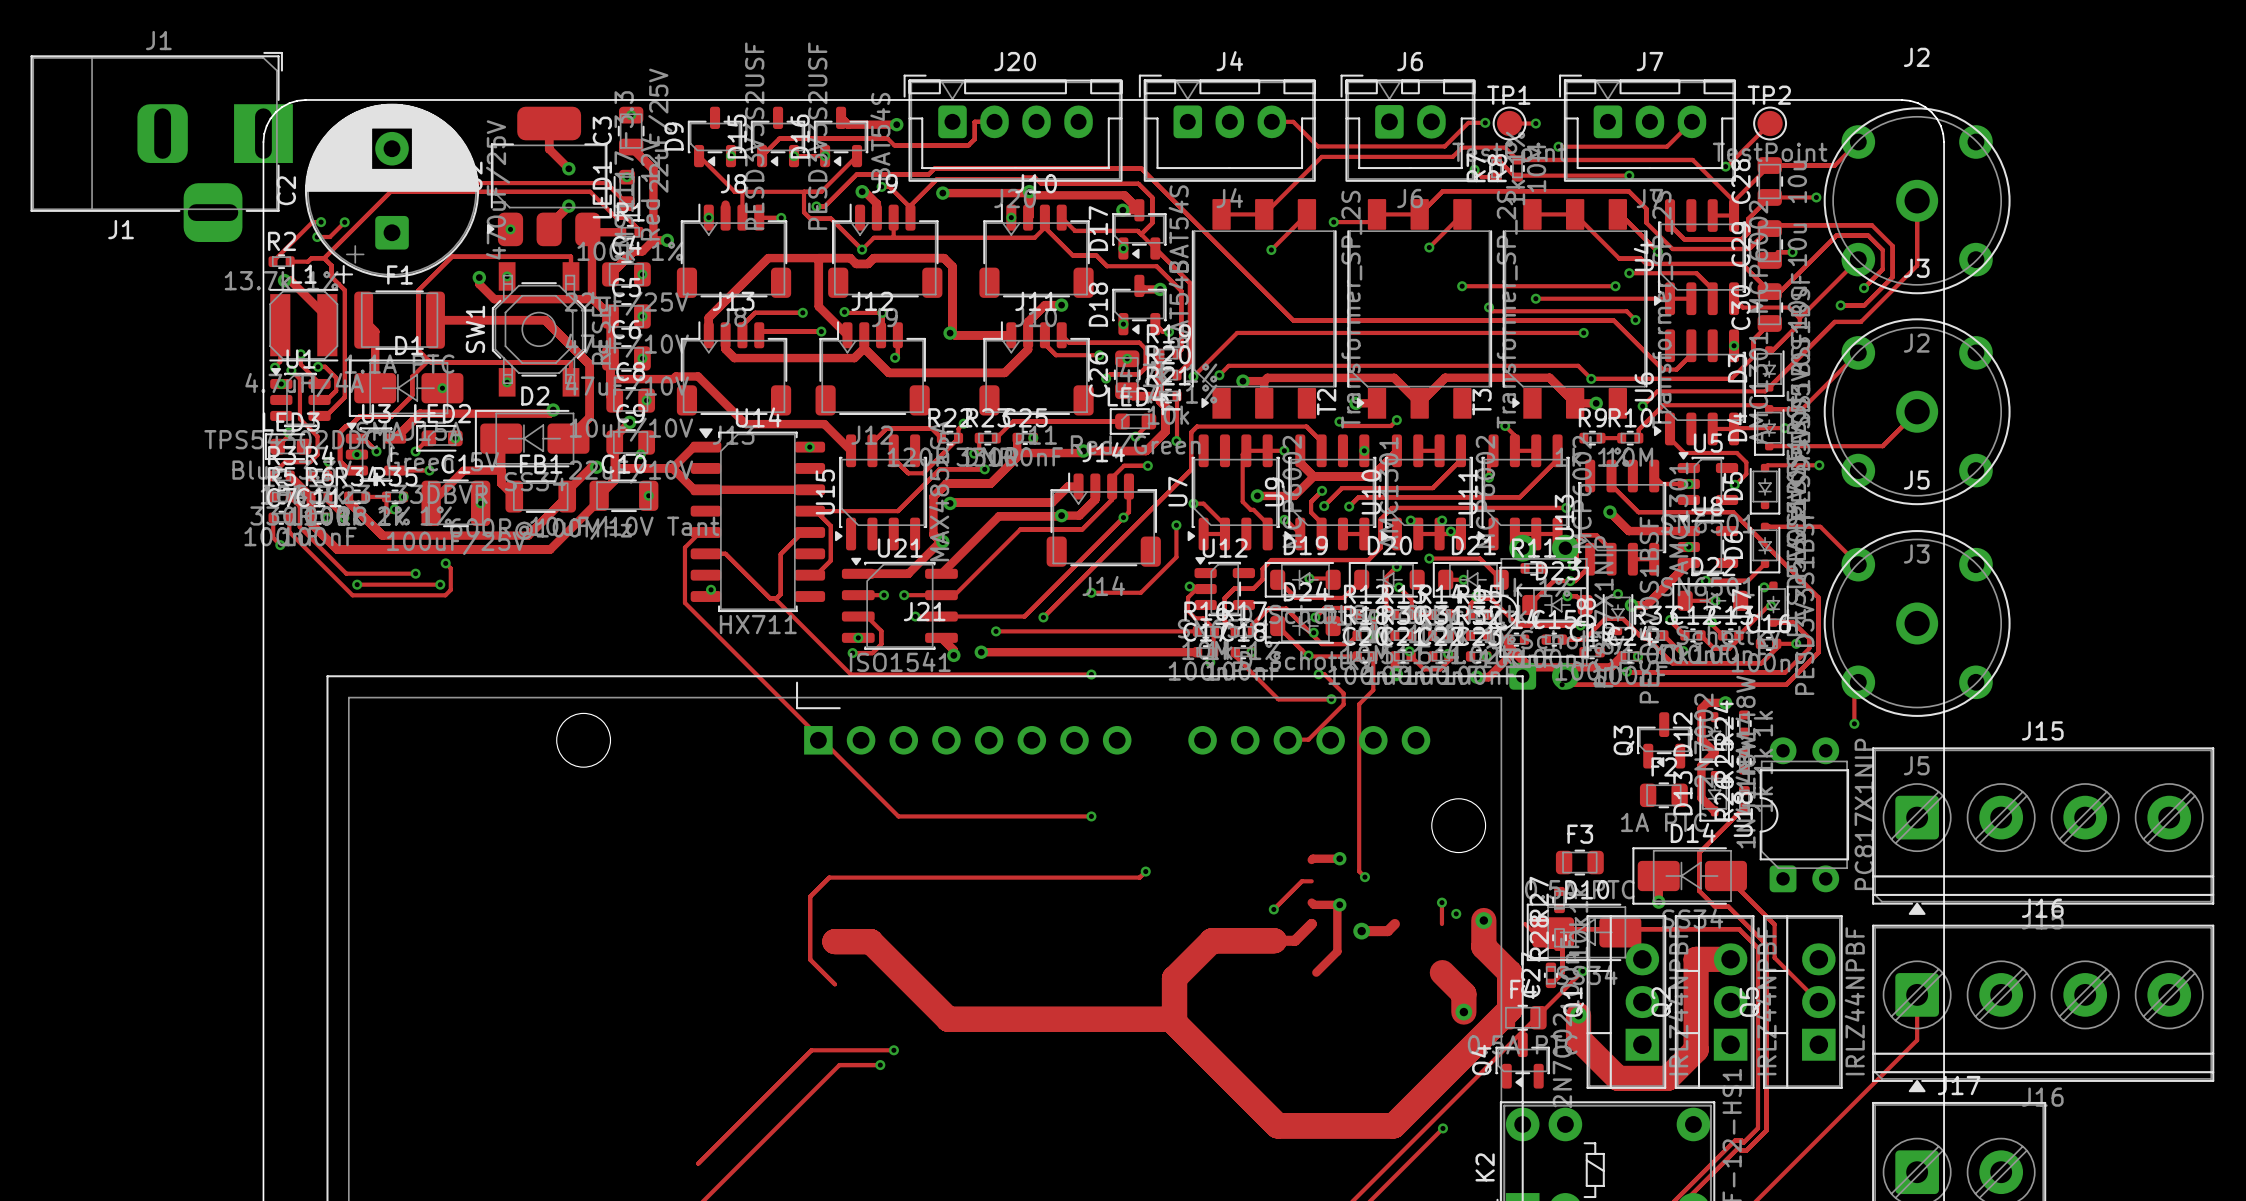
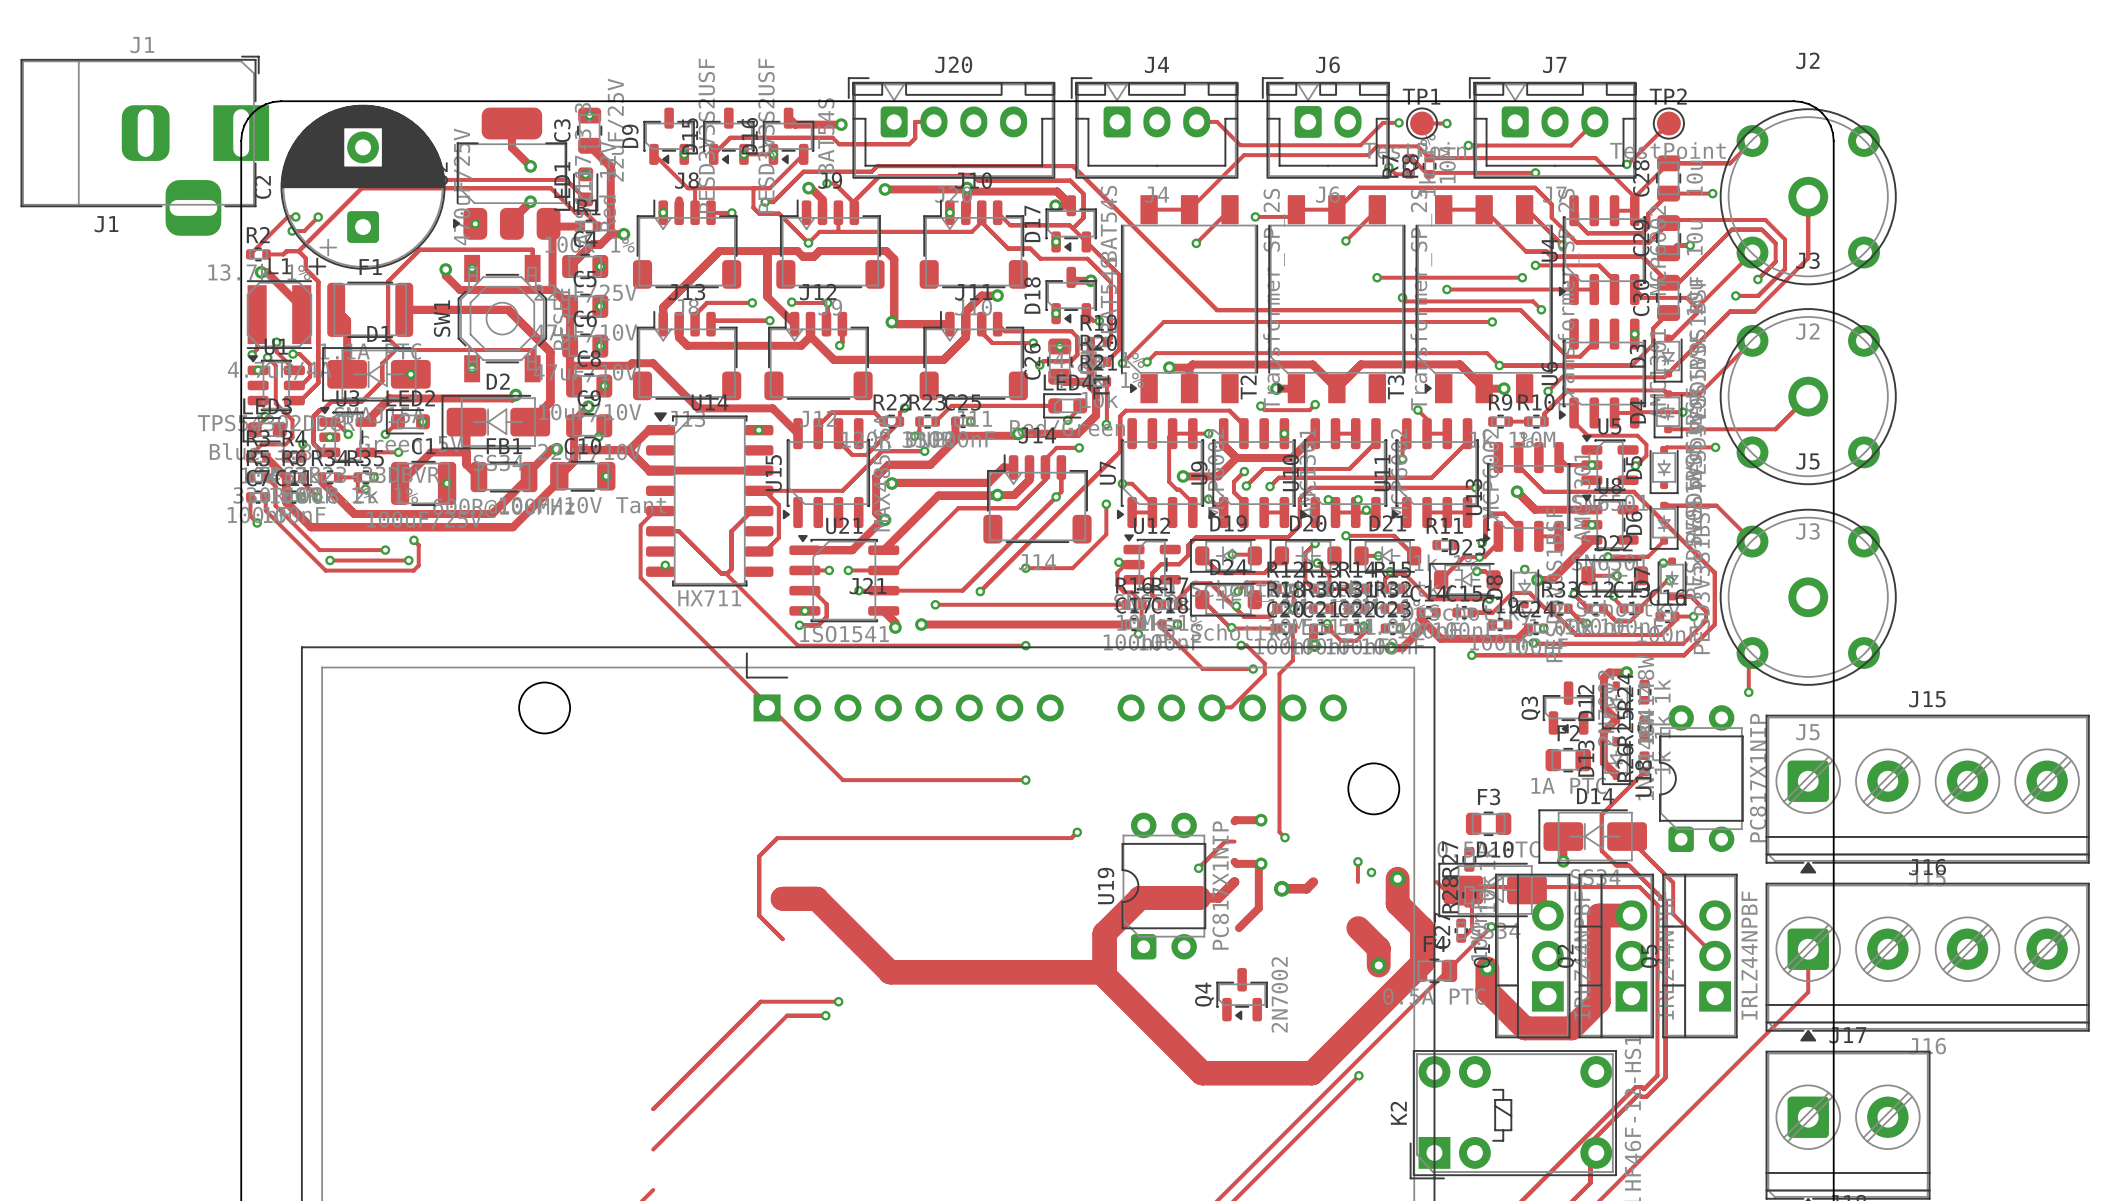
U19 position: (1544, 612) -> (1163, 886)
Q4 position: (1522, 1060) -> (1242, 994)

